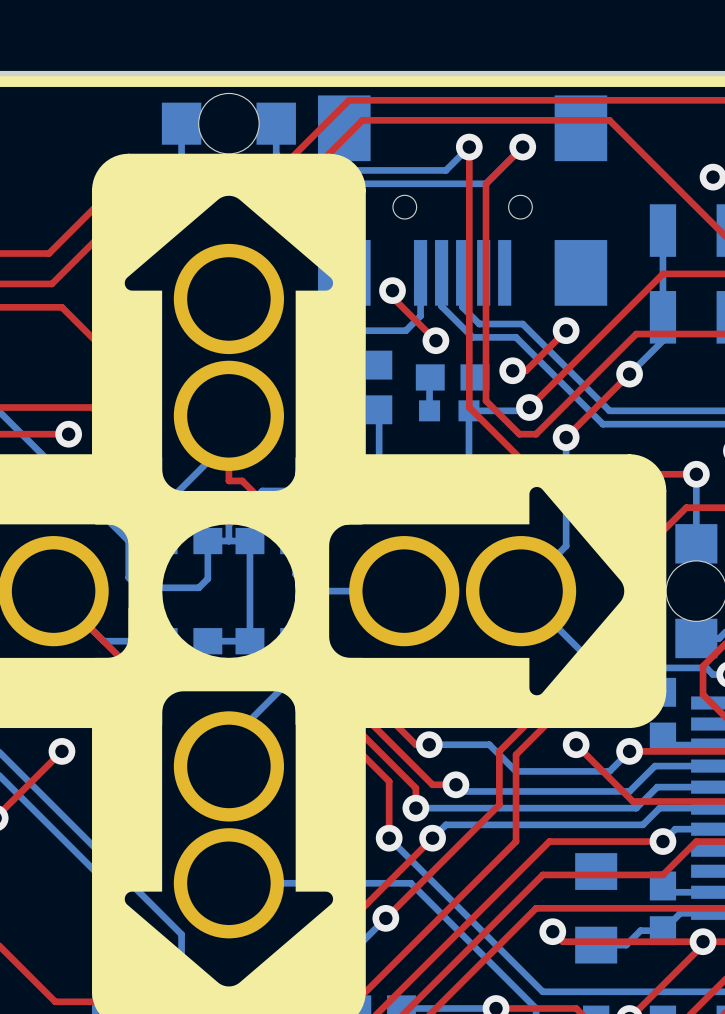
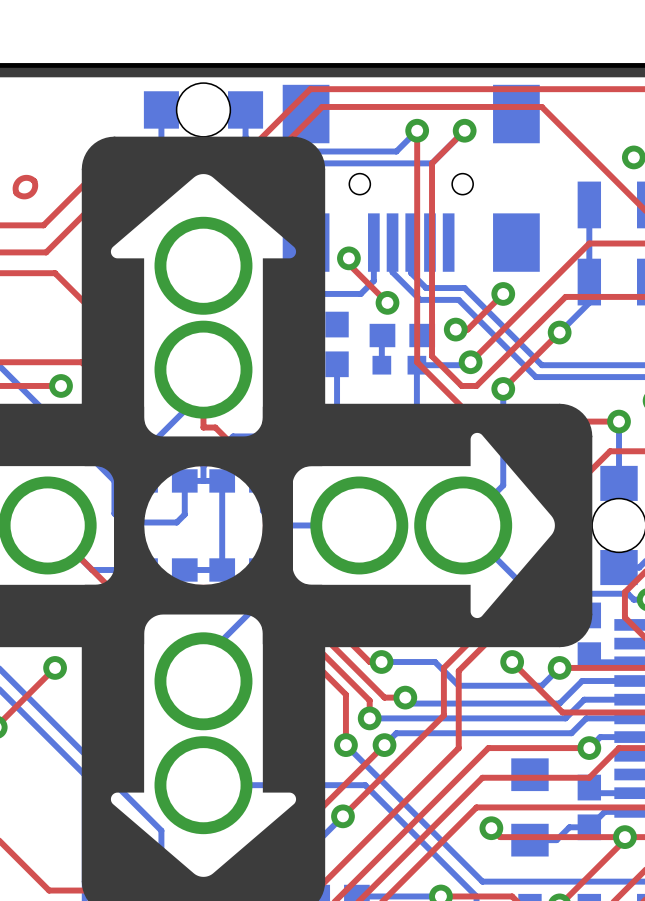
top track: none -> (34, 181) (34, 189) (30, 194) (22, 196) (16, 193) (16, 184) (20, 179) (26, 177) (34, 181)

